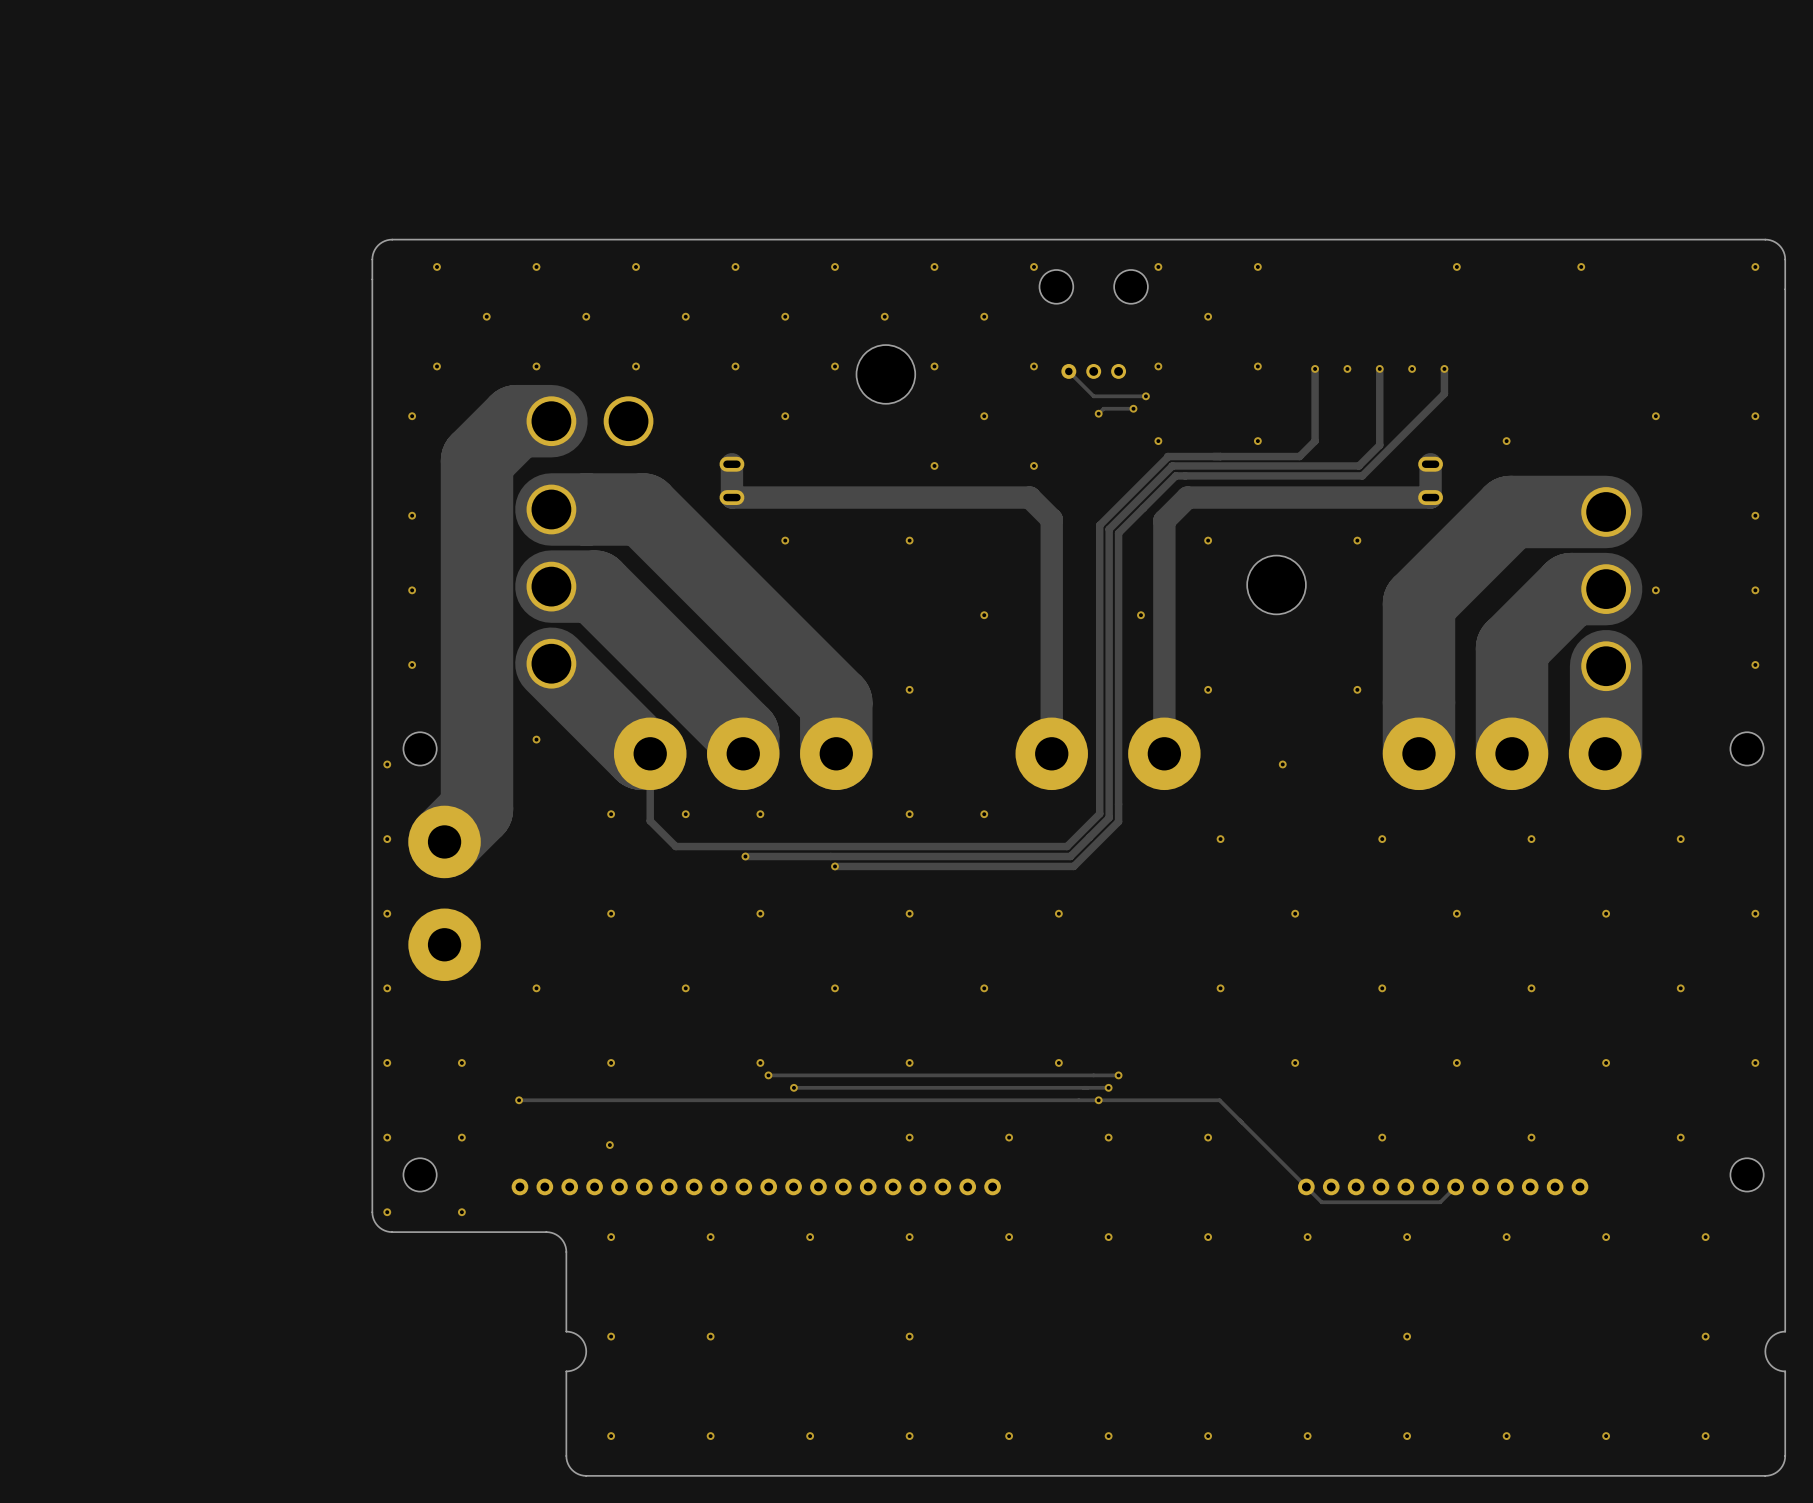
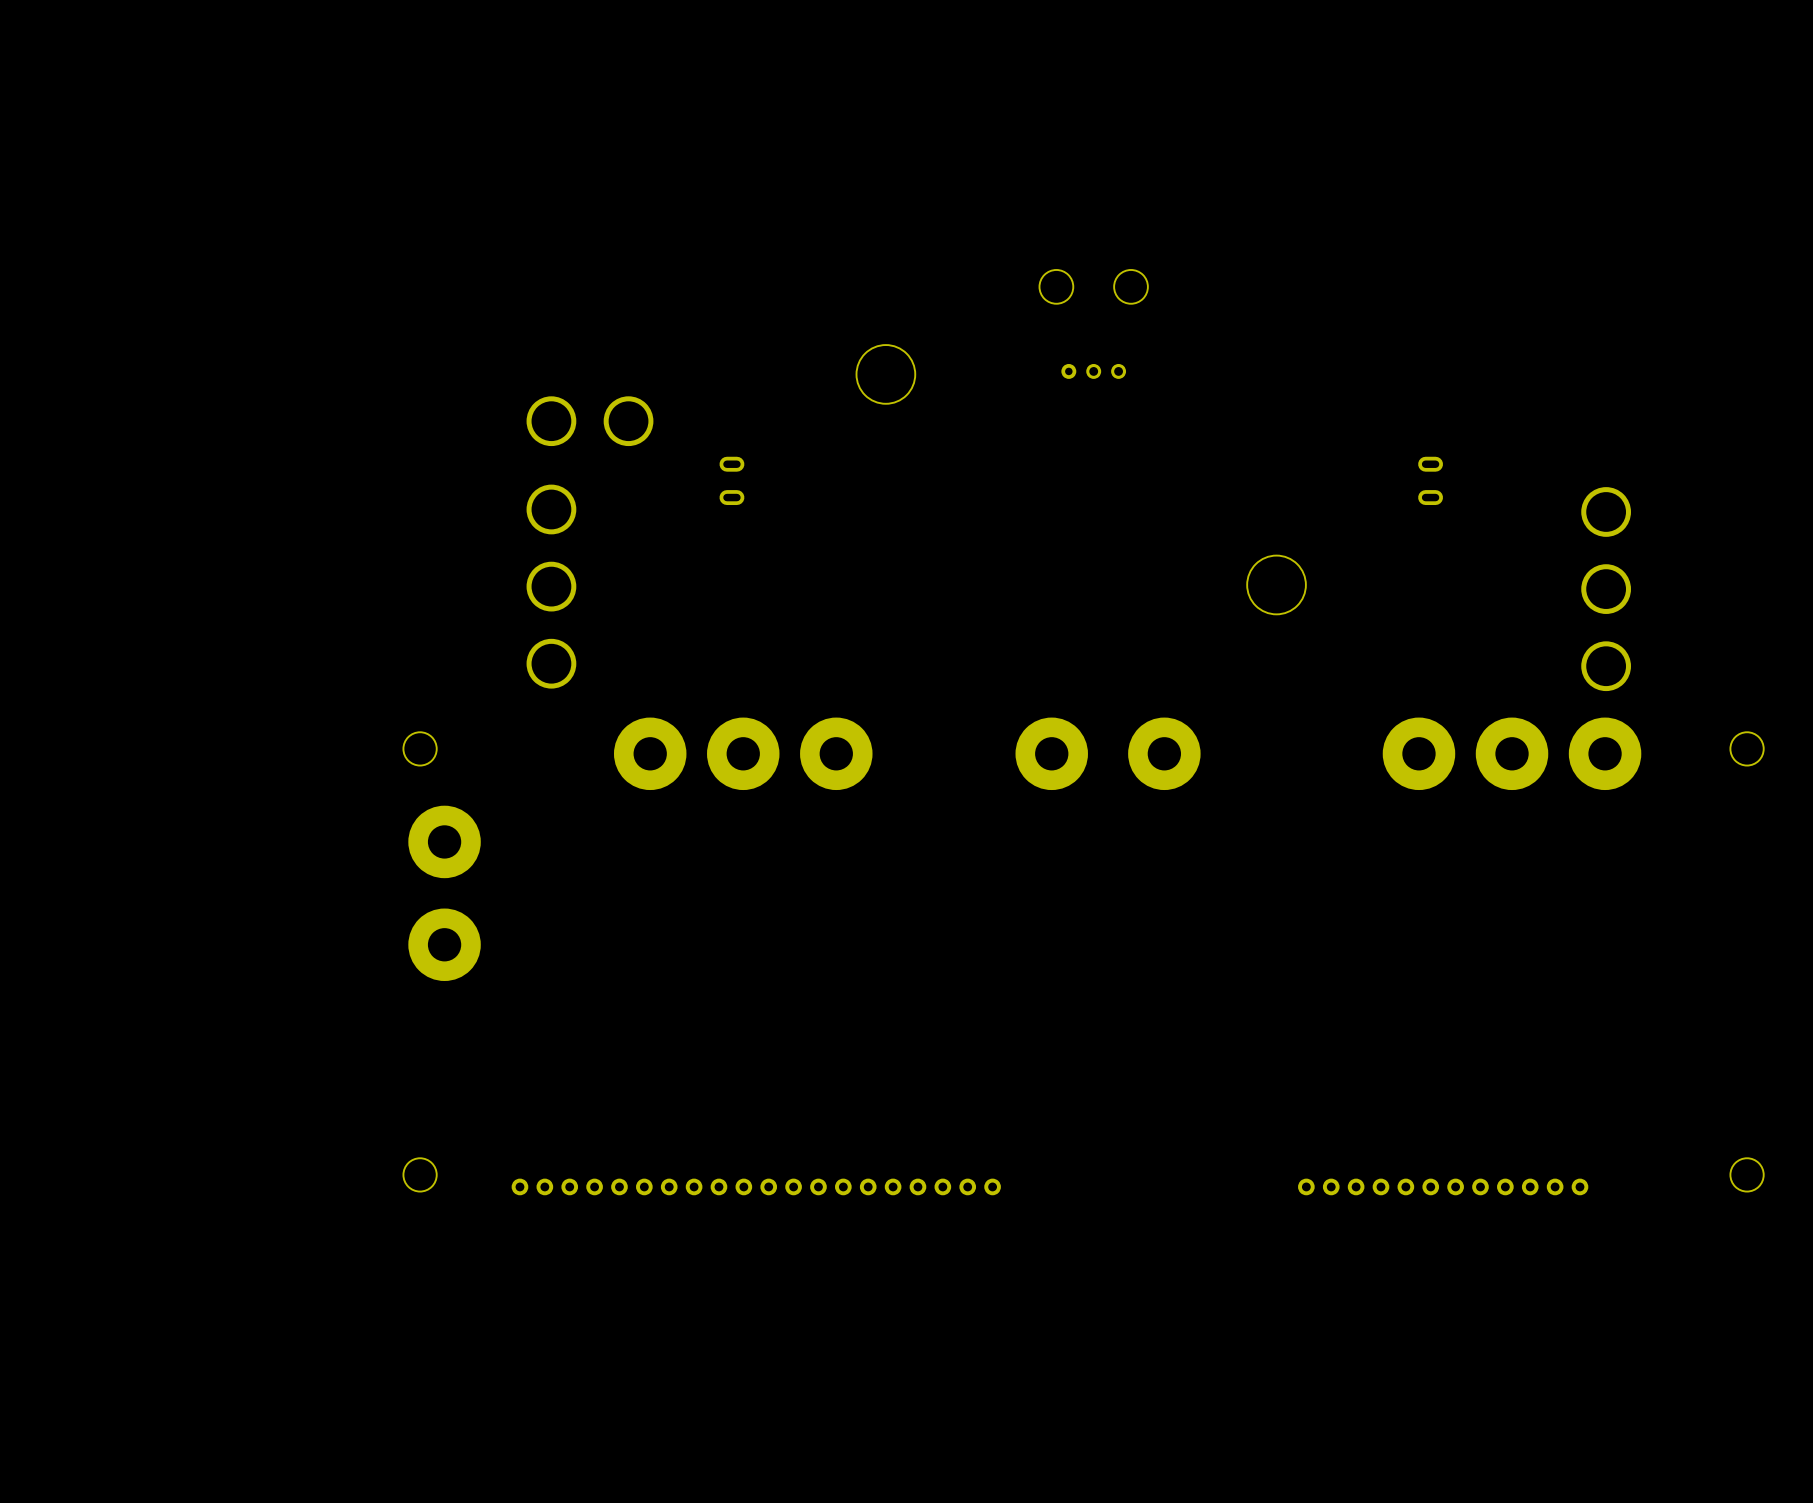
board edge: (1765, 239) (392, 239) (384, 241) (378, 245) (373, 251) (372, 259) (372, 1214) (378, 1226) (389, 1231) (546, 1232) (556, 1234) (562, 1239) (566, 1252) (566, 1331) (573, 1333) (580, 1337) (584, 1343) (586, 1351) (584, 1359) (580, 1365) (573, 1369) (566, 1371) (566, 1455) (567, 1463) (572, 1470) (578, 1474) (586, 1475) (1765, 1475) (1772, 1474) (1779, 1470) (1783, 1463) (1785, 1455) (1785, 1371) (1777, 1369) (1771, 1365) (1766, 1359) (1765, 1351) (1766, 1343) (1771, 1337) (1777, 1333) (1785, 1331) (1785, 259) (1783, 251) (1779, 245) (1772, 241) (1765, 239) -> none
via: (437, 266) -> none
via: (536, 266) -> none
via: (636, 266) -> none
via: (735, 266) -> none
via: (835, 266) -> none
via: (934, 266) -> none
via: (1034, 266) -> none
via: (1158, 266) -> none
via: (1257, 266) -> none
via: (1456, 266) -> none
via: (1581, 266) -> none
via: (1755, 266) -> none
via: (486, 316) -> none
via: (586, 316) -> none
via: (685, 316) -> none
via: (785, 316) -> none
via: (884, 316) -> none
via: (984, 316) -> none
via: (1208, 316) -> none
via: (437, 366) -> none
via: (536, 366) -> none
via: (636, 366) -> none
via: (735, 366) -> none
via: (835, 366) -> none
via: (934, 366) -> none
via: (1034, 366) -> none
via: (1158, 366) -> none
via: (1257, 366) -> none
track: (1315, 368) (1315, 441) (1299, 456) (1167, 456) (1099, 525) (1099, 813) (1067, 846) (675, 846) (650, 820) (650, 753) (641, 753) (551, 663) -> none
via: (1315, 368) -> none
via: (1347, 368) -> none
track: (1379, 368) (1379, 445) (1358, 465) (1172, 465) (1109, 529) (1109, 817) (1070, 856) (745, 856) -> none
via: (1379, 368) -> none
via: (1412, 368) -> none
track: (1444, 368) (1444, 393) (1362, 475) (1175, 475) (1118, 533) (1118, 821) (1073, 866) (835, 866) -> none
via: (1444, 368) -> none
track: (1068, 371) (1093, 396) (1145, 396) -> none
via: (1145, 396) -> none
track: (1133, 408) (1103, 408) (1098, 413) -> none
via: (1133, 408) -> none
via: (1098, 413) -> none
via: (412, 416) -> none
via: (785, 416) -> none
via: (984, 416) -> none
via: (1655, 416) -> none
via: (1755, 416) -> none
track: (551, 421) (516, 421) (477, 460) (477, 809) (444, 841) -> none
via: (1158, 441) -> none
via: (1257, 441) -> none
via: (1506, 441) -> none
track: (731, 464) (731, 497) (1029, 497) (1051, 519) (1051, 753) -> none
track: (1430, 464) (1430, 497) (1187, 497) (1164, 520) (1164, 753) -> none
via: (934, 465) -> none
via: (1034, 465) -> none
track: (551, 509) (643, 509) (836, 702) (836, 753) -> none
track: (1606, 511) (1510, 511) (1418, 603) (1418, 753) -> none
via: (412, 515) -> none
via: (1755, 515) -> none
via: (785, 540) -> none
via: (909, 540) -> none
via: (1208, 540) -> none
via: (1357, 540) -> none
track: (551, 586) (594, 586) (743, 734) (743, 753) -> none
track: (1606, 589) (1570, 589) (1512, 648) (1512, 753) -> none
via: (412, 590) -> none
via: (1655, 590) -> none
via: (1755, 590) -> none
via: (984, 615) -> none
via: (1140, 615) -> none
via: (412, 664) -> none
via: (1755, 664) -> none
track: (1606, 666) (1606, 752) -> none
via: (909, 689) -> none
via: (1208, 689) -> none
via: (1357, 689) -> none
via: (536, 739) -> none
via: (387, 764) -> none
via: (1282, 764) -> none
via: (611, 814) -> none
via: (685, 814) -> none
via: (760, 814) -> none
via: (909, 814) -> none
via: (984, 814) -> none
via: (387, 839) -> none
via: (1220, 839) -> none
via: (1382, 839) -> none
via: (1531, 839) -> none
via: (1680, 839) -> none
via: (745, 856) -> none
via: (835, 866) -> none
via: (387, 913) -> none
via: (611, 913) -> none
via: (760, 913) -> none
via: (909, 913) -> none
via: (1058, 913) -> none
via: (1295, 913) -> none
via: (1456, 913) -> none
via: (1606, 913) -> none
via: (1755, 913) -> none
via: (387, 988) -> none
via: (536, 988) -> none
via: (685, 988) -> none
via: (835, 988) -> none
via: (984, 988) -> none
via: (1220, 988) -> none
via: (1382, 988) -> none
via: (1531, 988) -> none
via: (1680, 988) -> none
via: (387, 1062) -> none
via: (461, 1062) -> none
via: (611, 1062) -> none
via: (760, 1062) -> none
via: (909, 1062) -> none
via: (1058, 1062) -> none
via: (1295, 1062) -> none
via: (1456, 1062) -> none
via: (1606, 1062) -> none
via: (1755, 1062) -> none
via: (768, 1075) -> none
track: (1118, 1075) (767, 1075) -> none
via: (1118, 1075) -> none
via: (793, 1087) -> none
track: (1108, 1087) (793, 1087) -> none
via: (1108, 1087) -> none
track: (519, 1100) (1219, 1100) (1321, 1202) (1440, 1202) (1455, 1186) -> none
via: (519, 1100) -> none
via: (1098, 1100) -> none
via: (387, 1137) -> none
via: (461, 1137) -> none
via: (909, 1137) -> none
via: (1009, 1137) -> none
via: (1108, 1137) -> none
via: (1208, 1137) -> none
via: (1382, 1137) -> none
via: (1531, 1137) -> none
via: (1680, 1137) -> none
via: (609, 1145) -> none
via: (387, 1212) -> none
via: (461, 1212) -> none
via: (611, 1237) -> none
via: (710, 1237) -> none
via: (810, 1237) -> none
via: (909, 1237) -> none
via: (1009, 1237) -> none
via: (1108, 1237) -> none
via: (1208, 1237) -> none
via: (1307, 1237) -> none
via: (1407, 1237) -> none
via: (1506, 1237) -> none
via: (1606, 1237) -> none
via: (1705, 1237) -> none
via: (611, 1336) -> none
via: (710, 1336) -> none
via: (909, 1336) -> none
via: (1407, 1336) -> none
via: (1705, 1336) -> none
via: (611, 1436) -> none
via: (710, 1436) -> none
via: (810, 1436) -> none
via: (909, 1436) -> none
via: (1009, 1436) -> none
via: (1108, 1436) -> none
via: (1208, 1436) -> none
via: (1307, 1436) -> none
via: (1407, 1436) -> none
via: (1506, 1436) -> none
via: (1606, 1436) -> none
via: (1705, 1436) -> none

